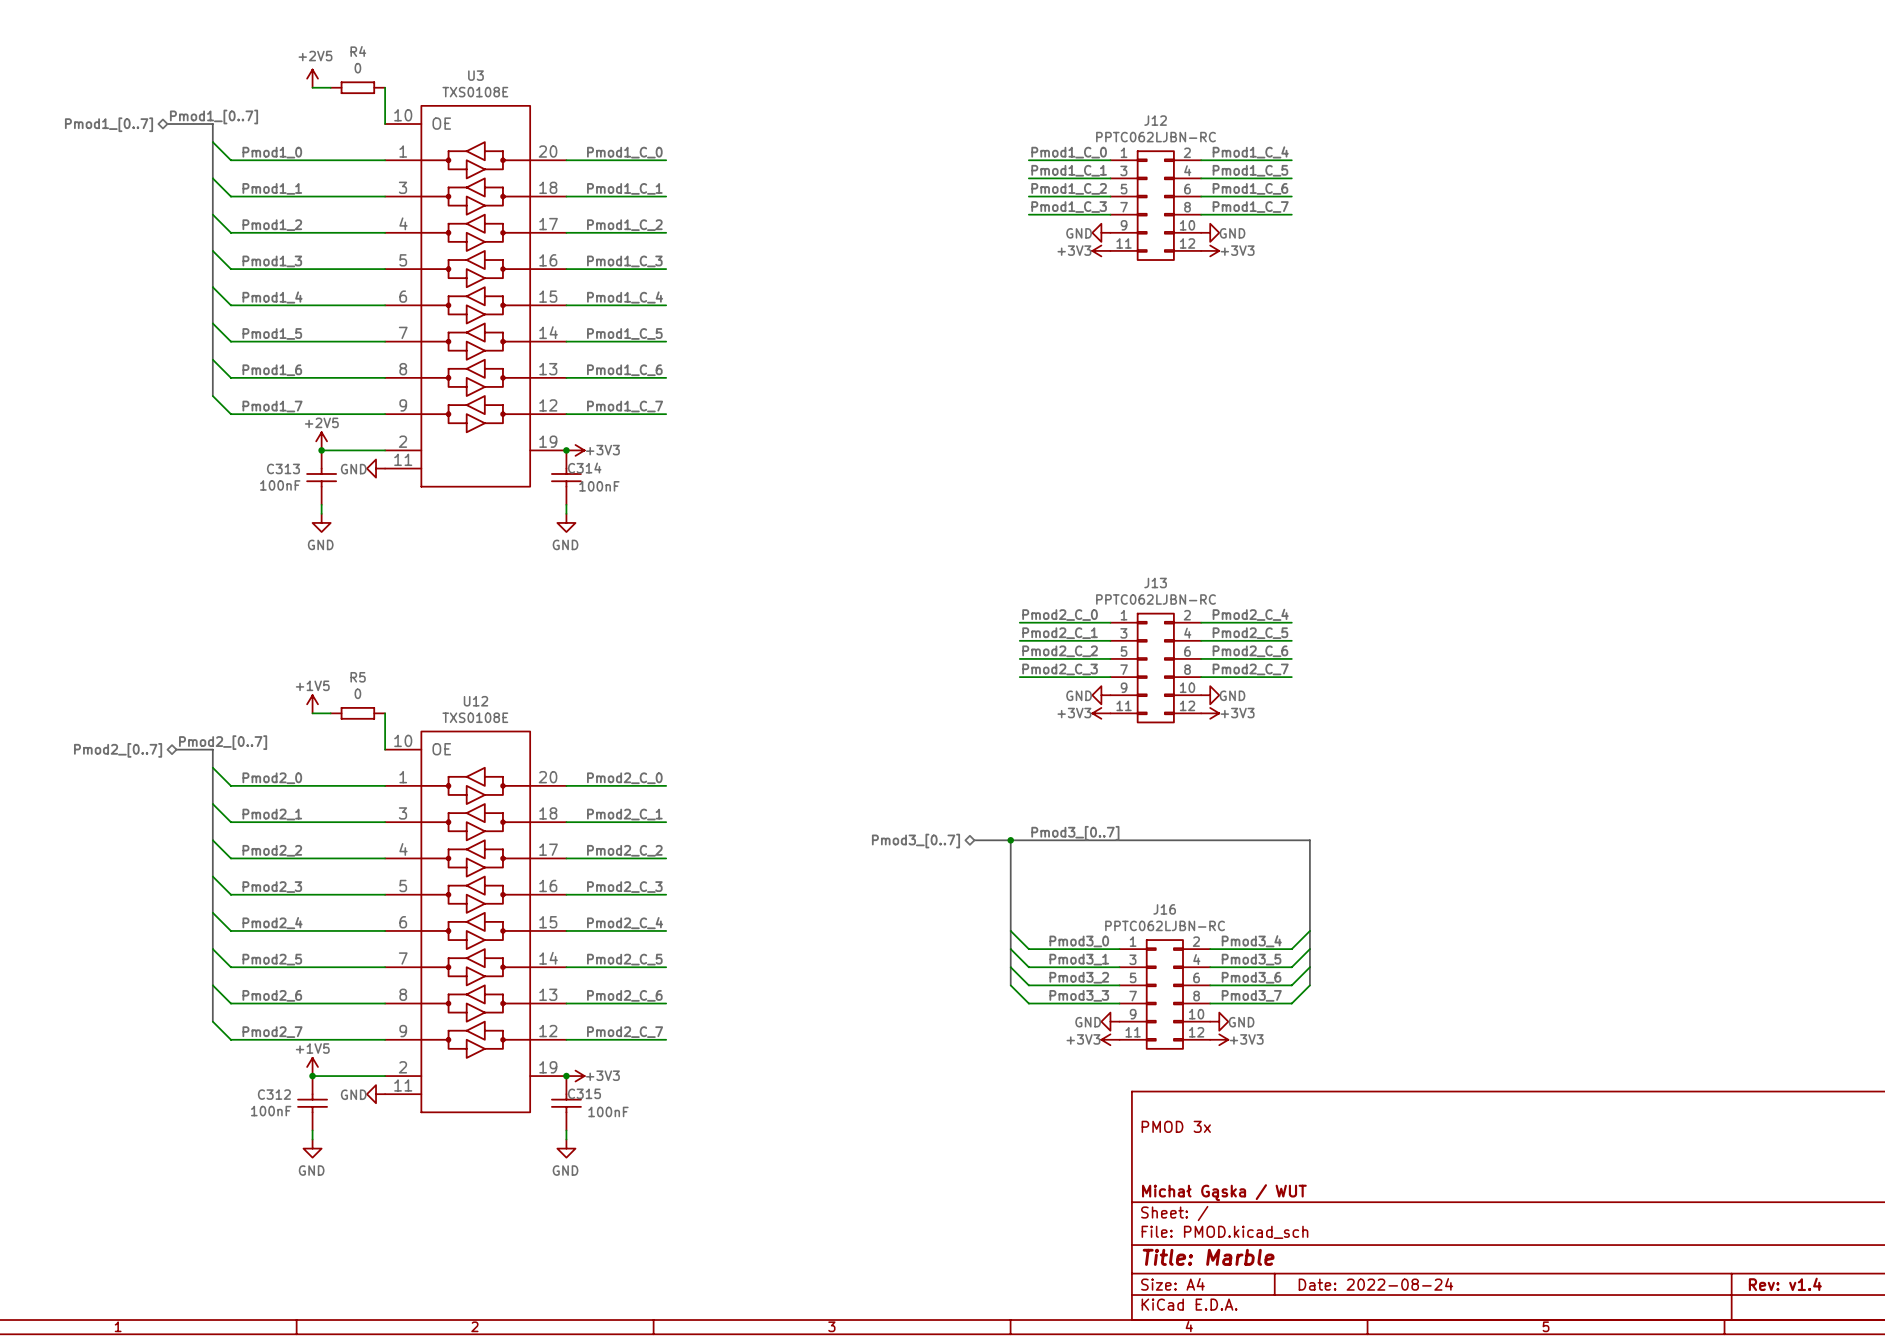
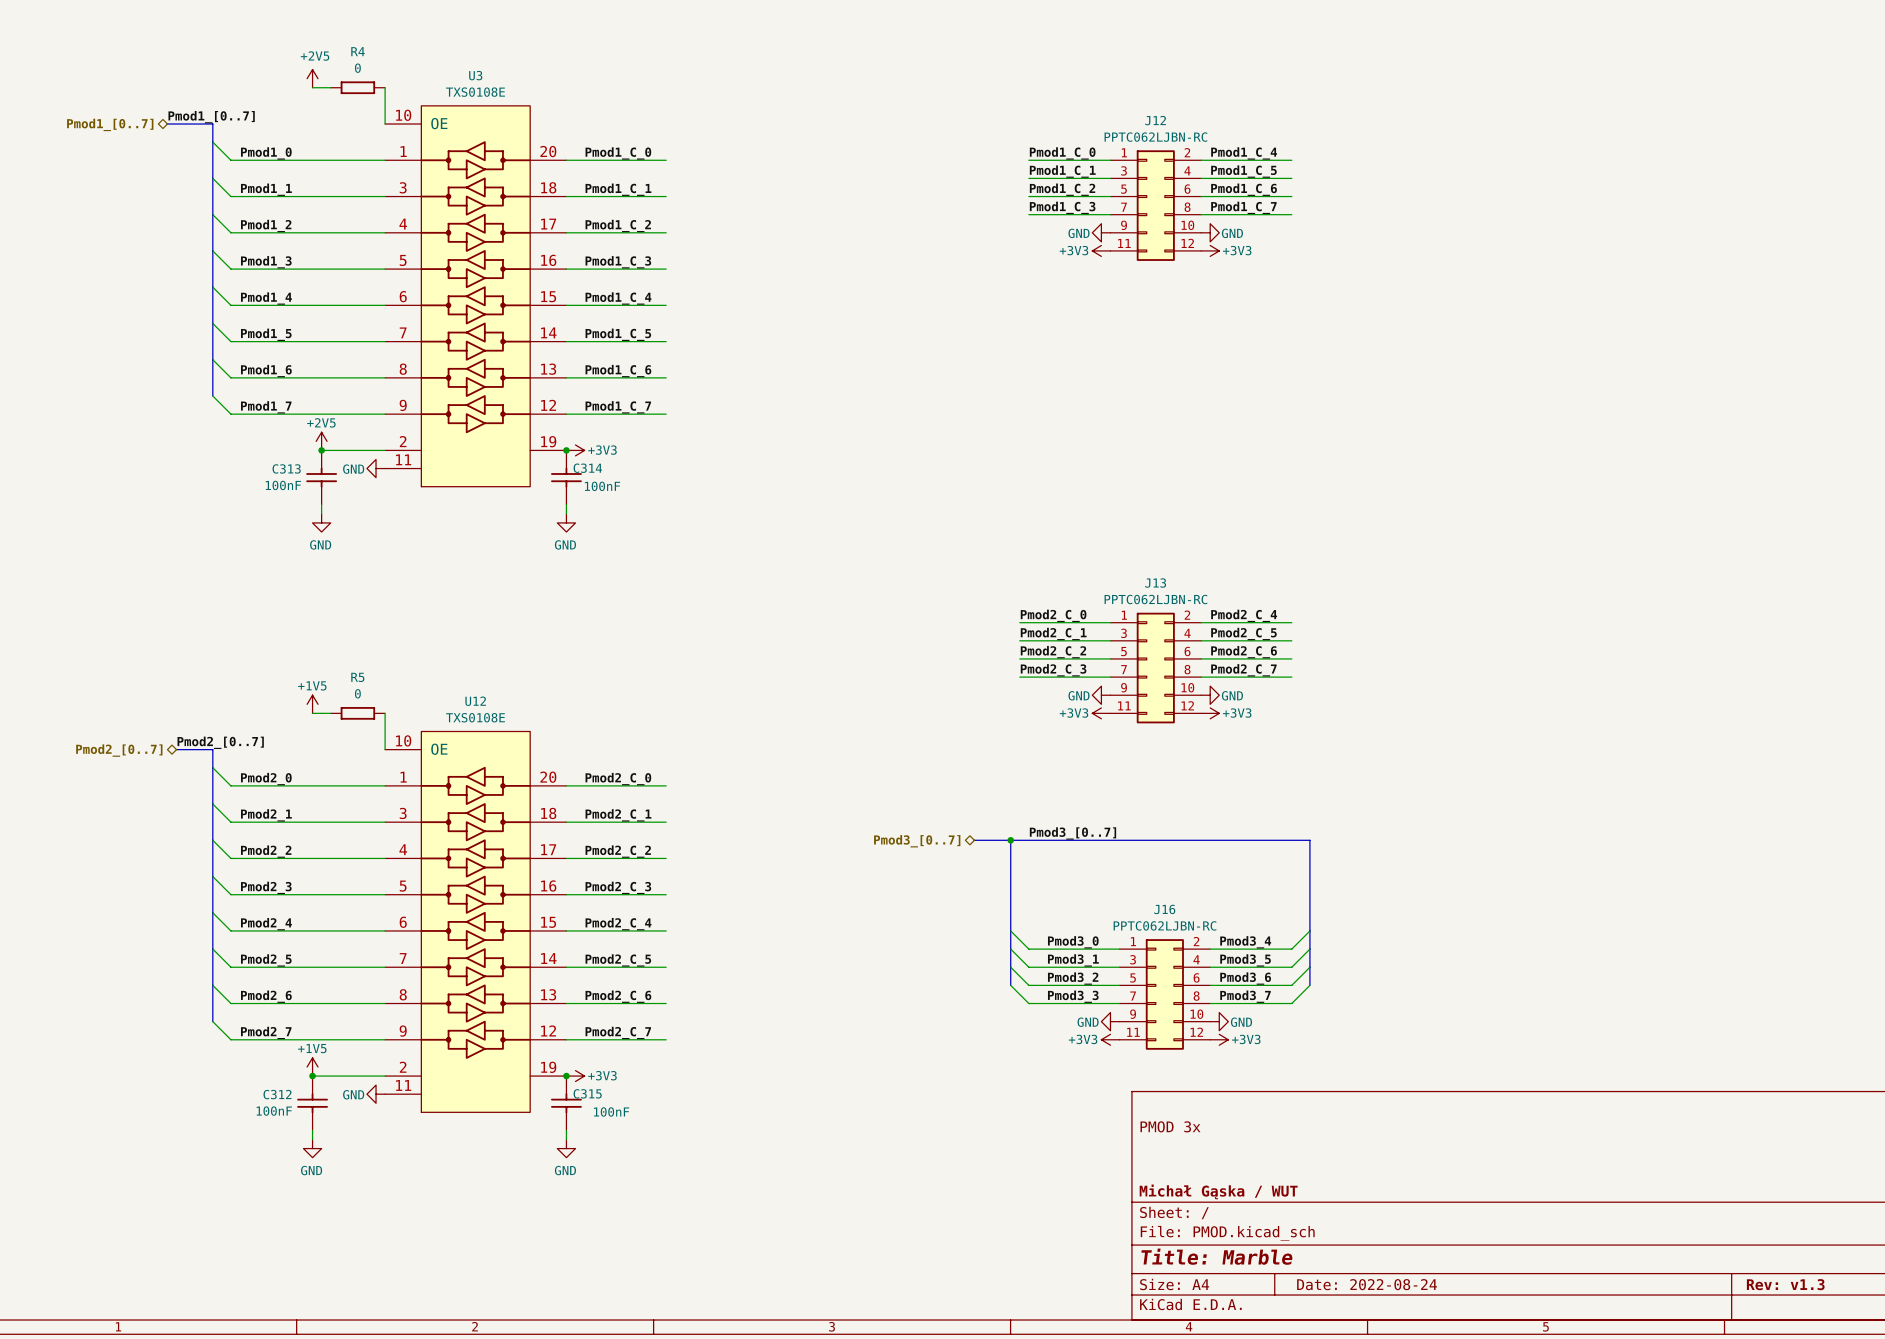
title block: Rev: v1.4 (1785, 1284) -> Rev: v1.3 (1785, 1284)

